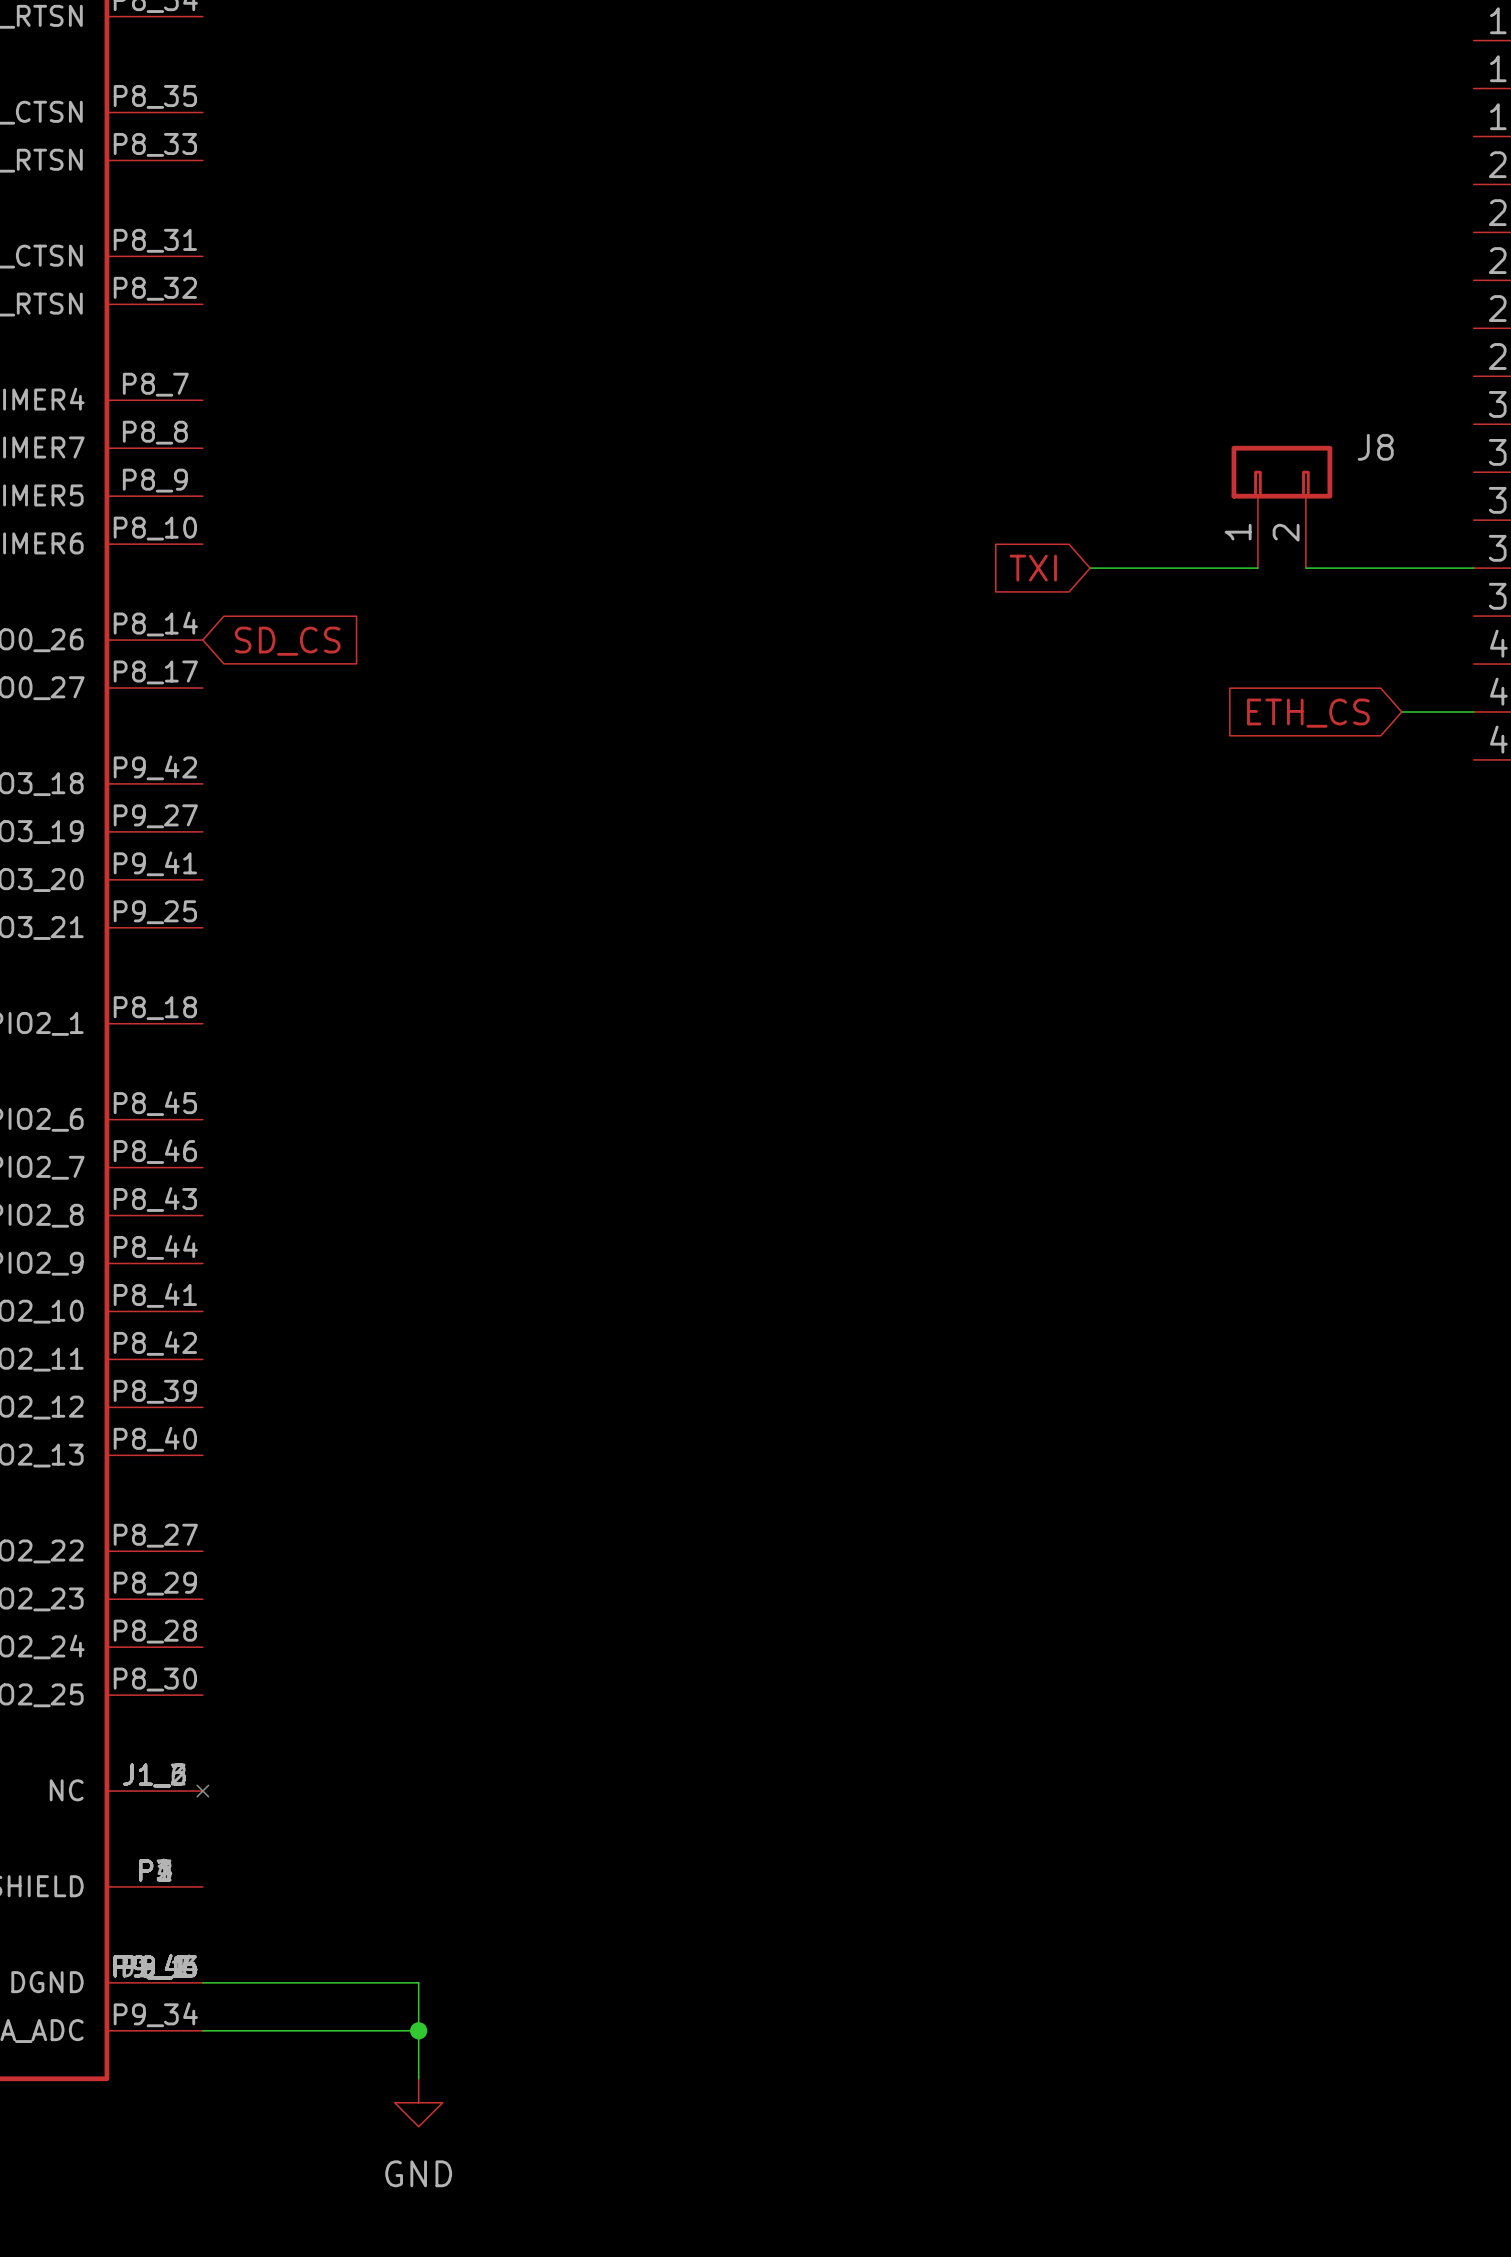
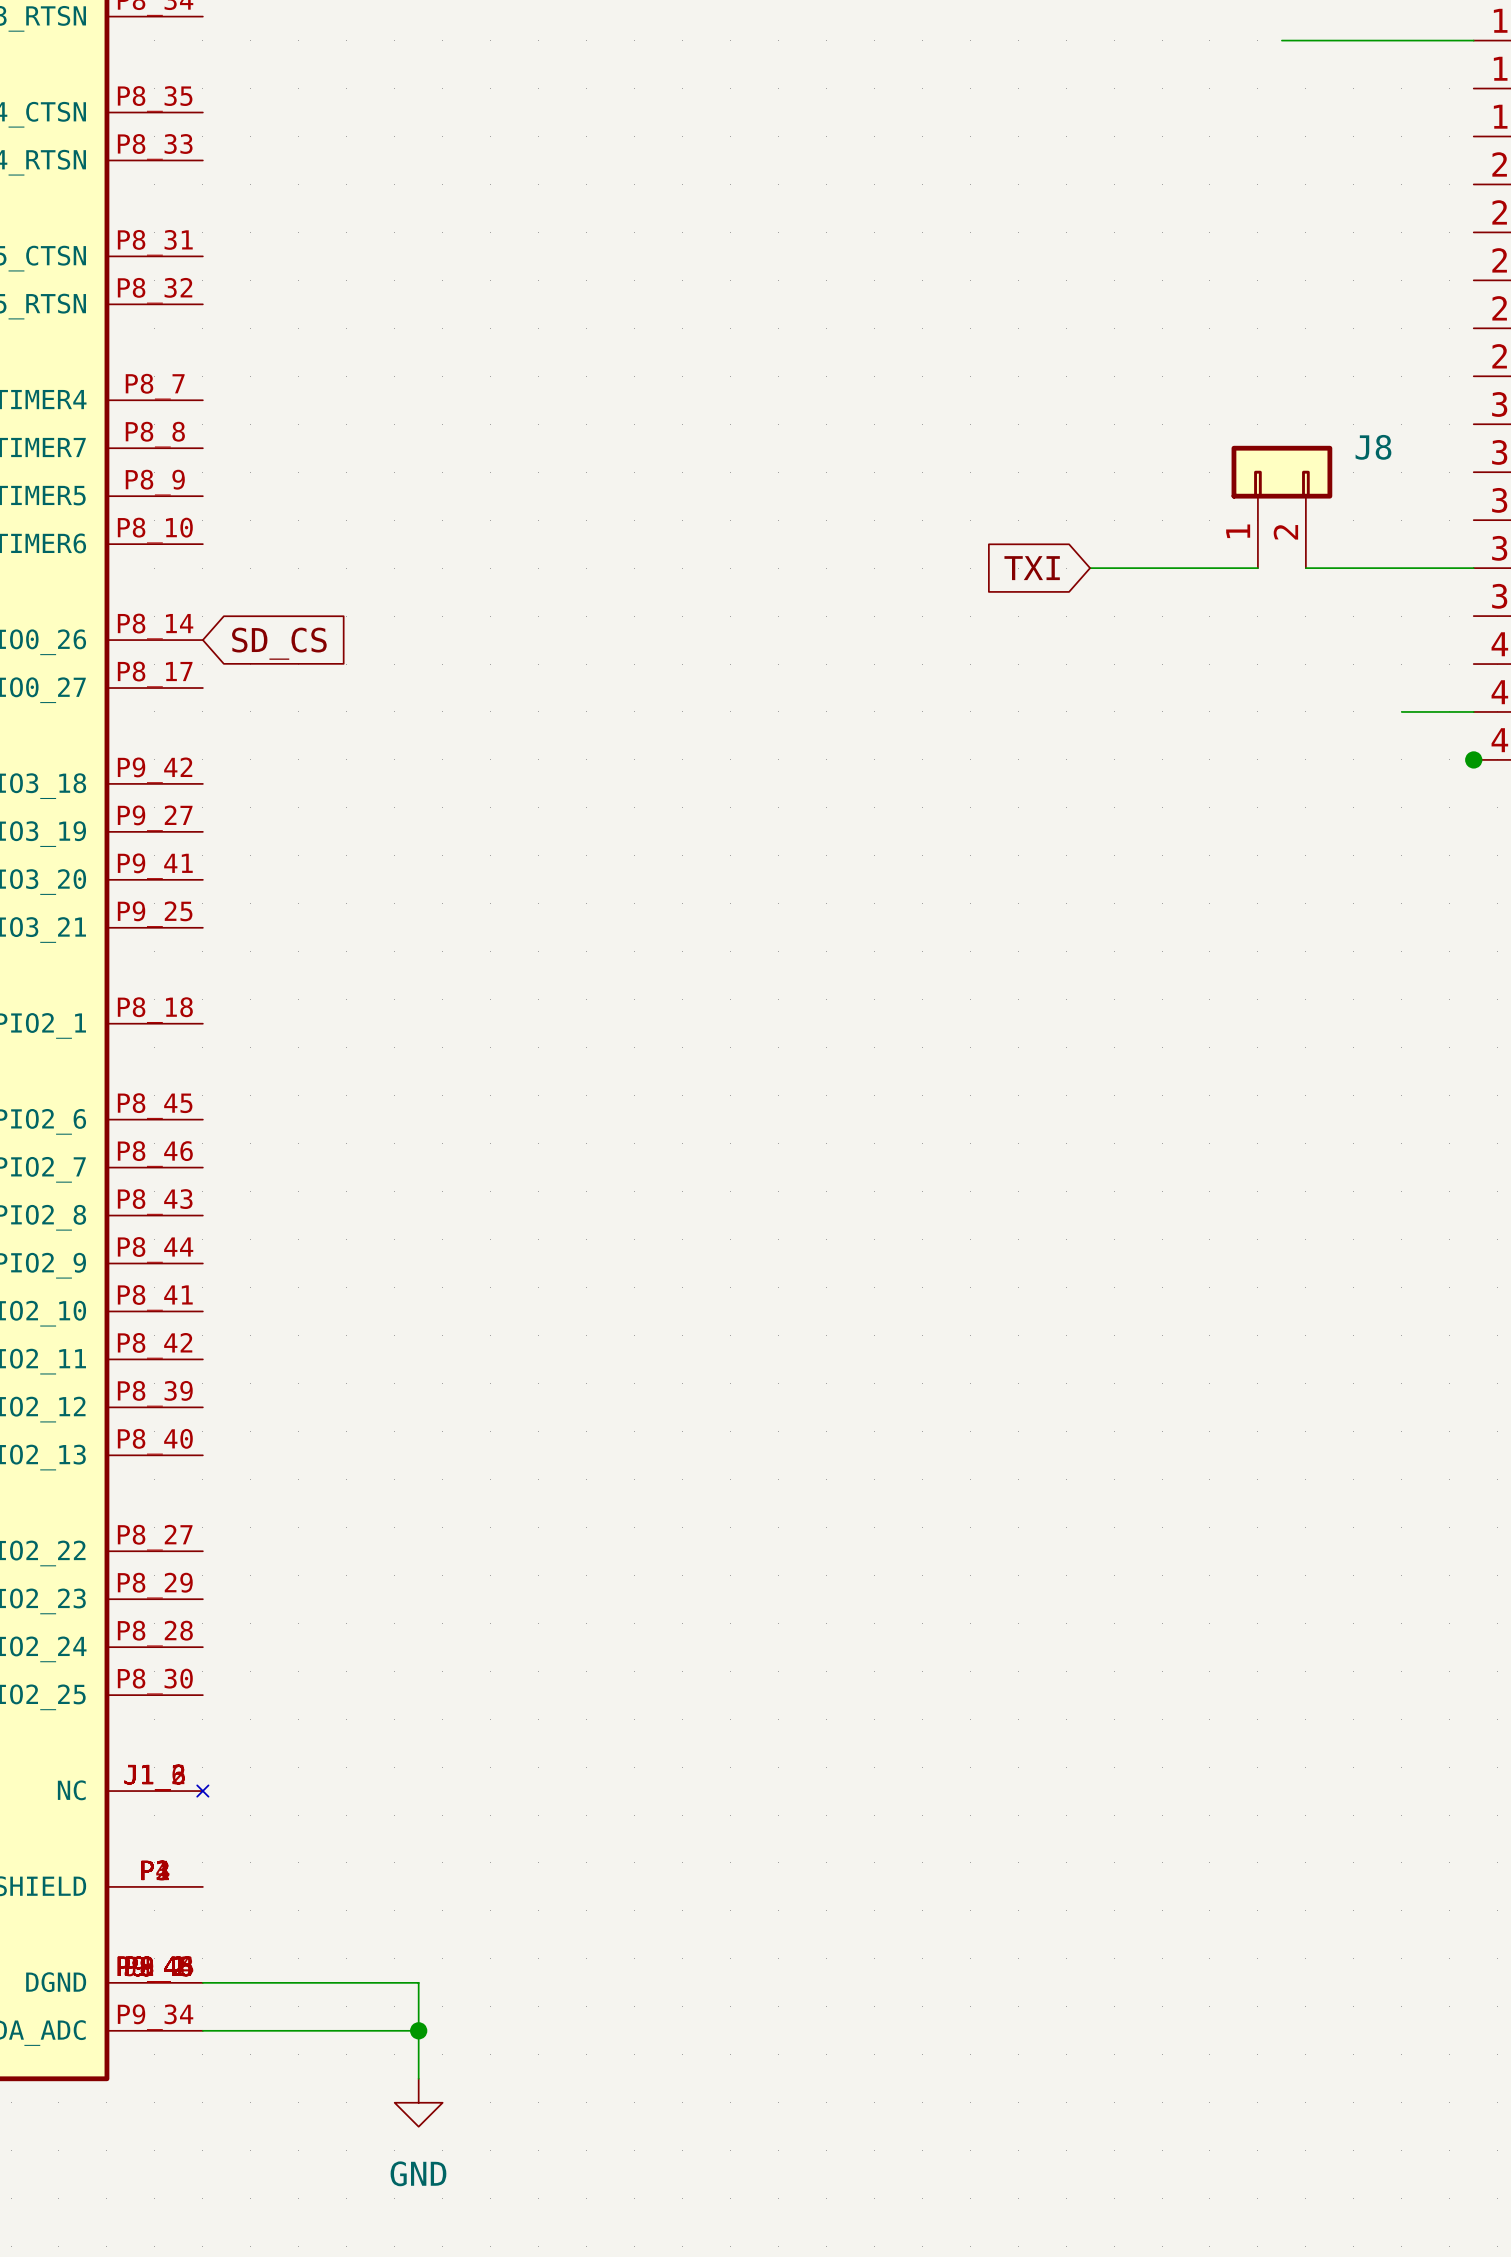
wire: none -> (1281, 40) (1473, 40)
global label: ETH_CS (1308, 713) -> none
junction: none -> (1473, 759)

